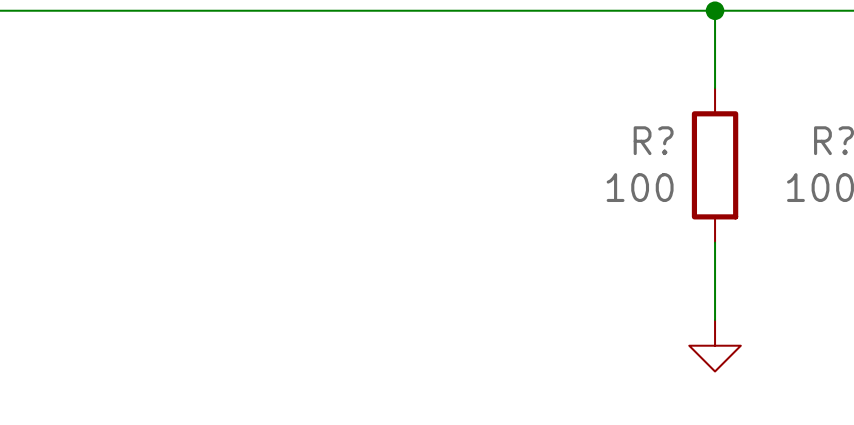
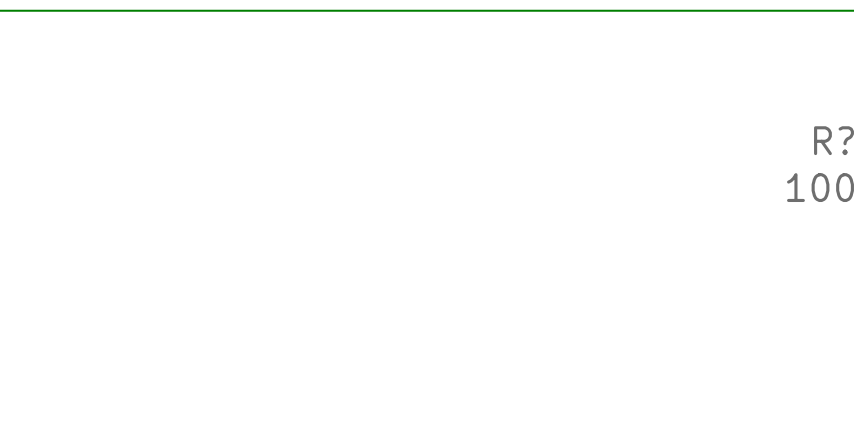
wire: (715, 10) (715, 88) -> none
junction: (715, 10) -> none
R?: 100 (715, 165) -> none
wire: (715, 242) (715, 319) -> none
power symbol: (715, 345) -> none

